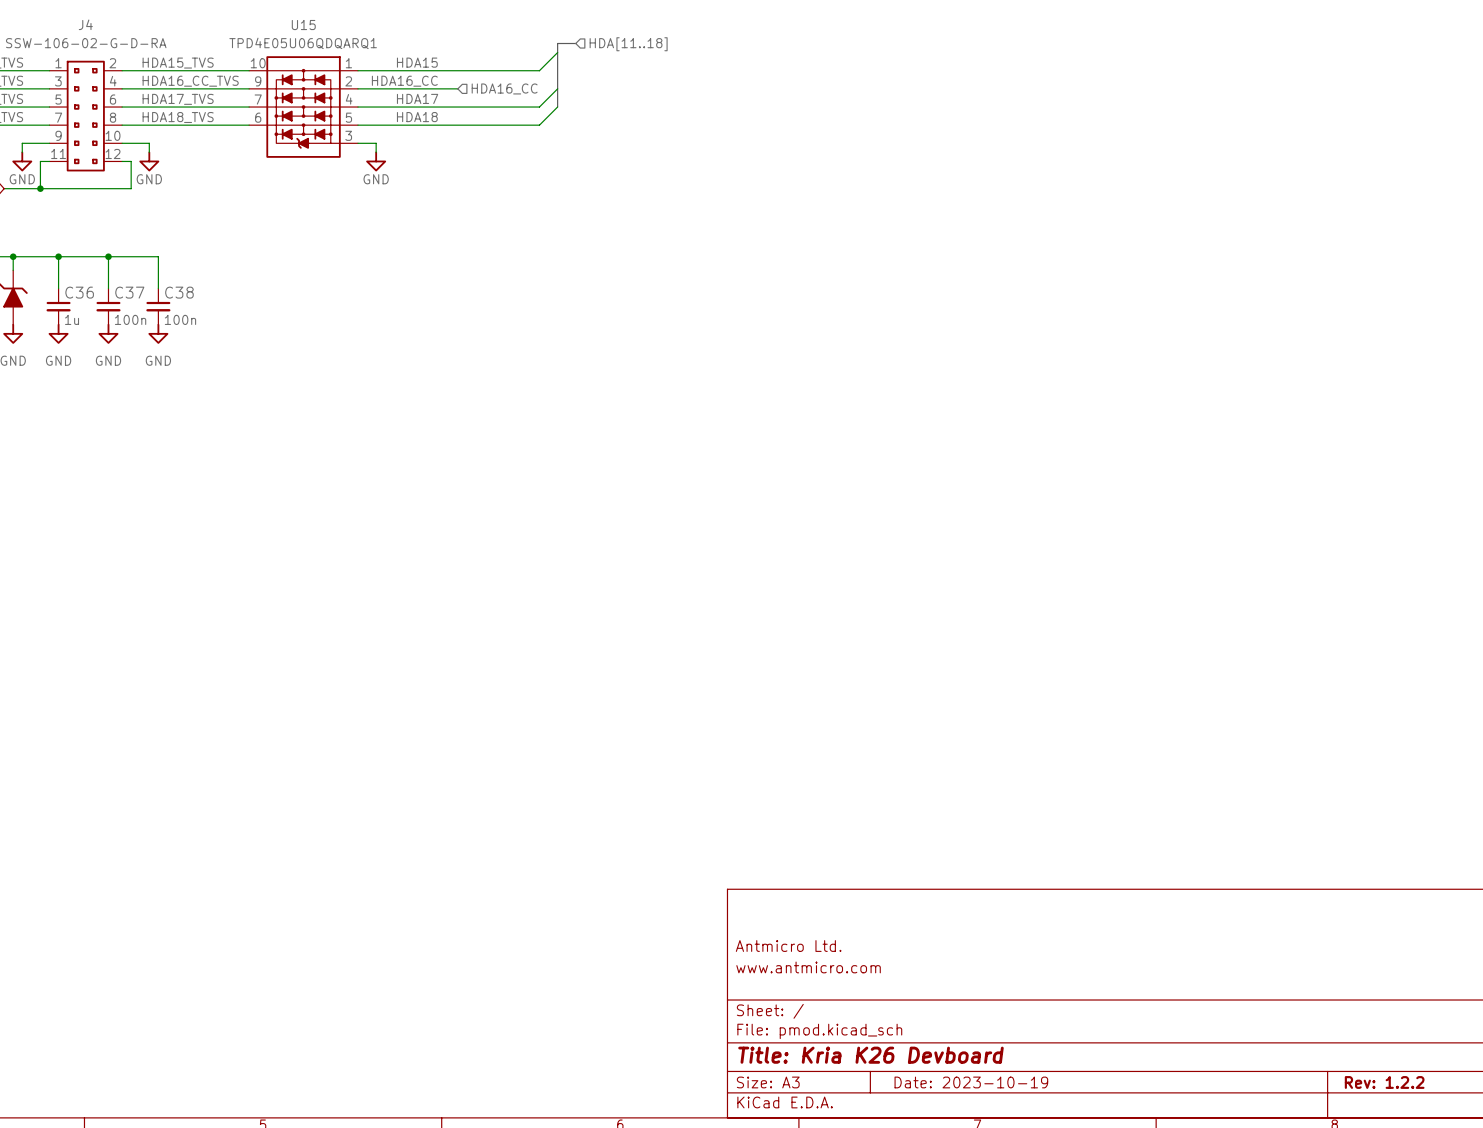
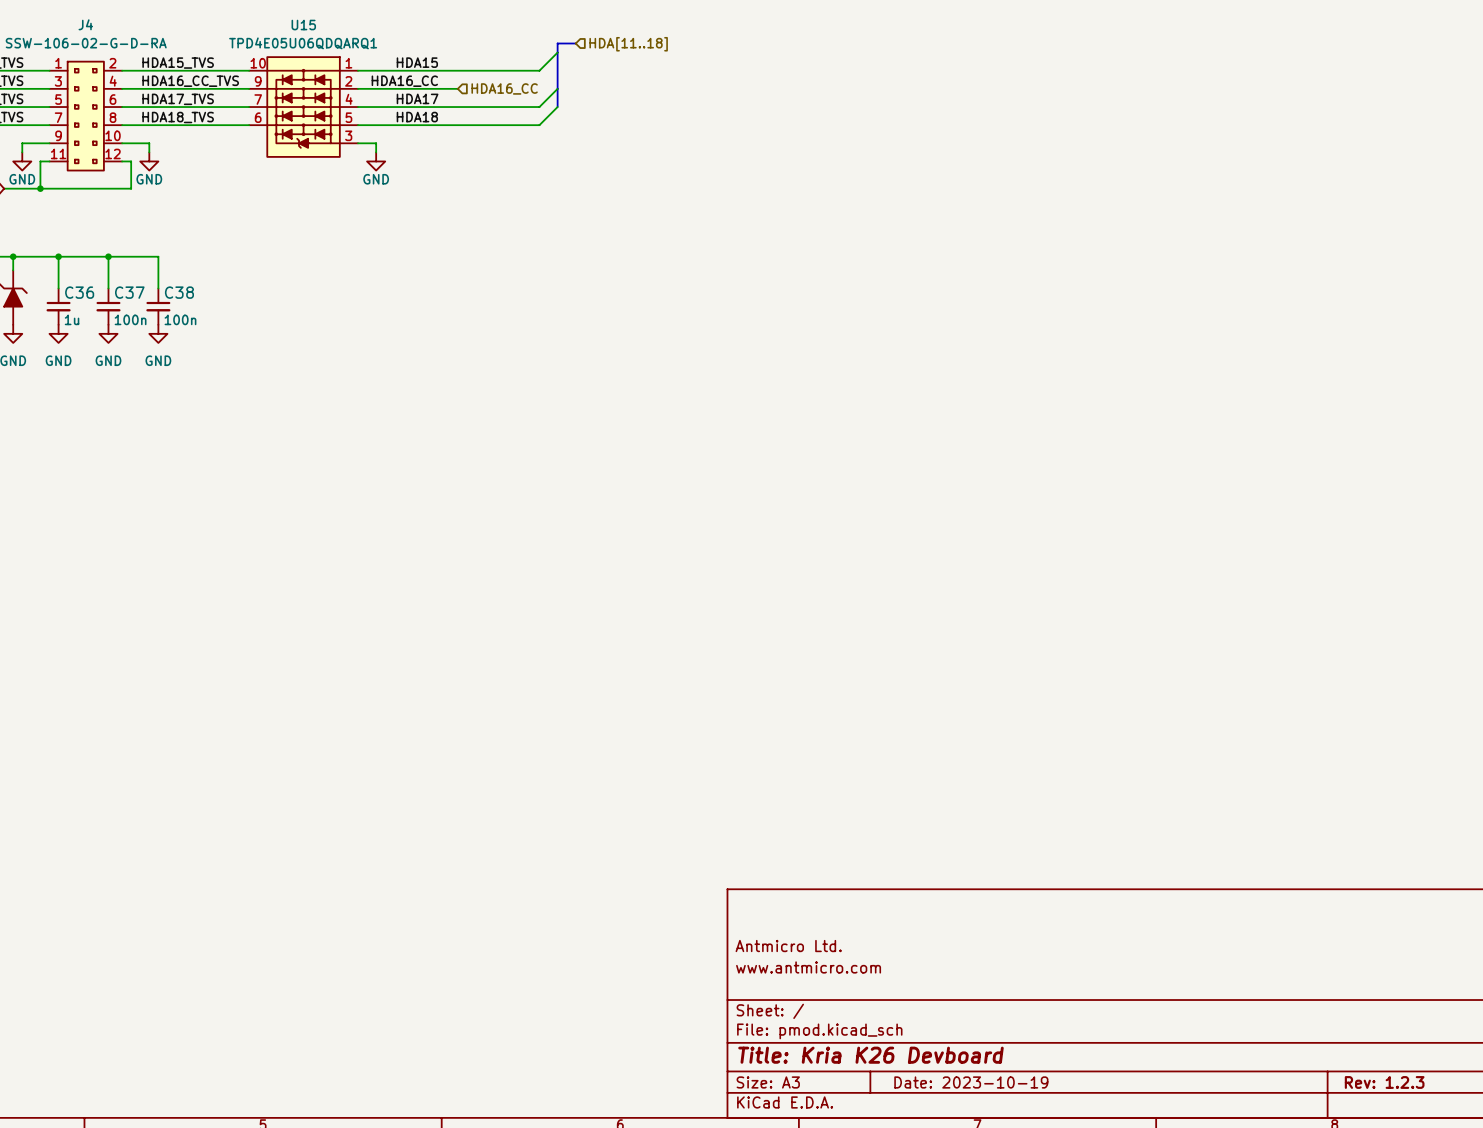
title block: Rev: 1.2.2 (1384, 1082) -> Rev: 1.2.3 (1384, 1082)

